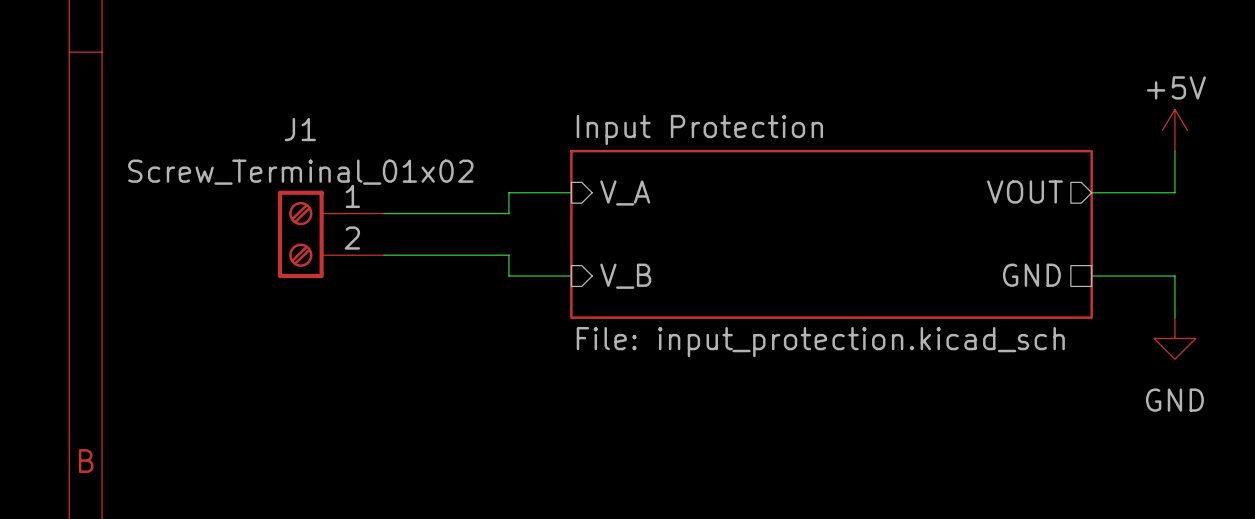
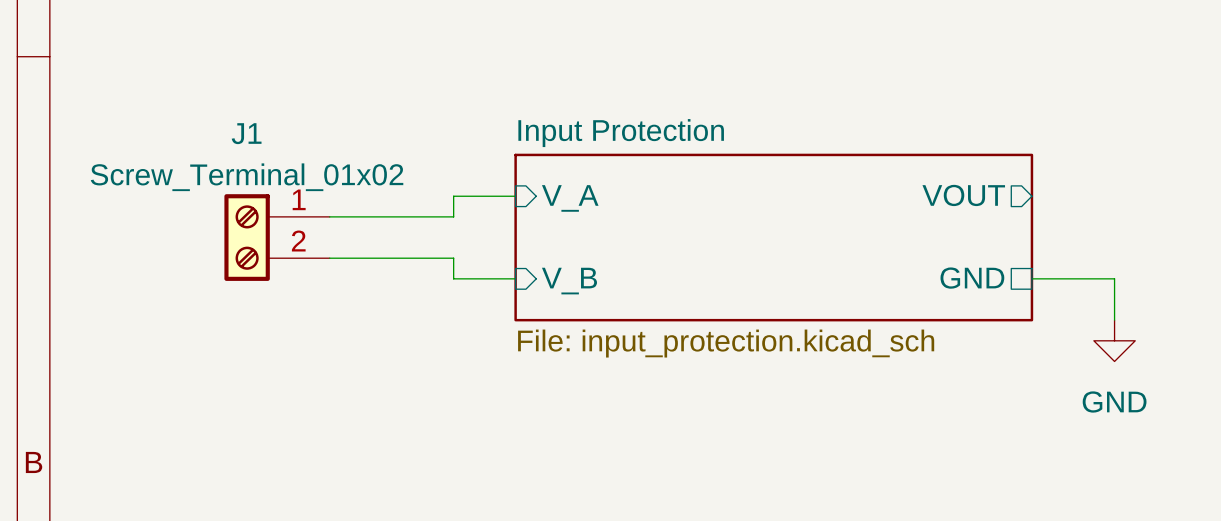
power symbol: +5V (1174, 130) -> none
wire: (1174, 151) (1174, 192) (1091, 192) -> none

